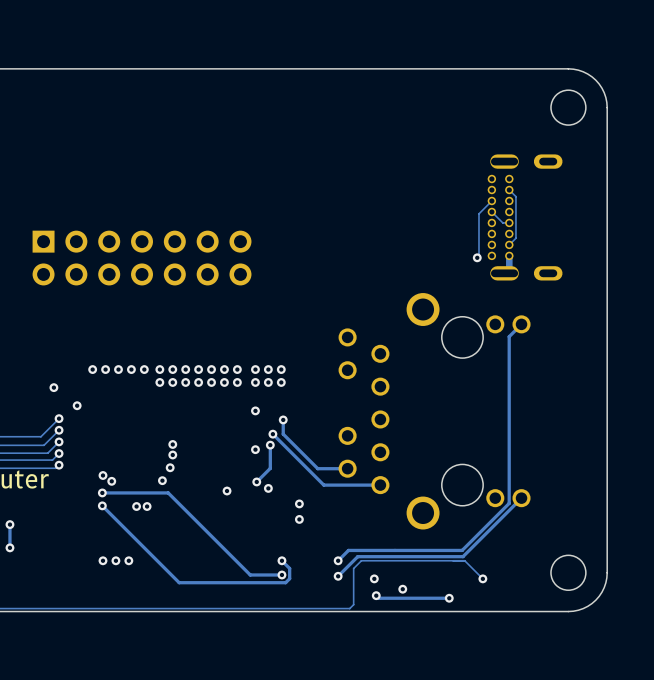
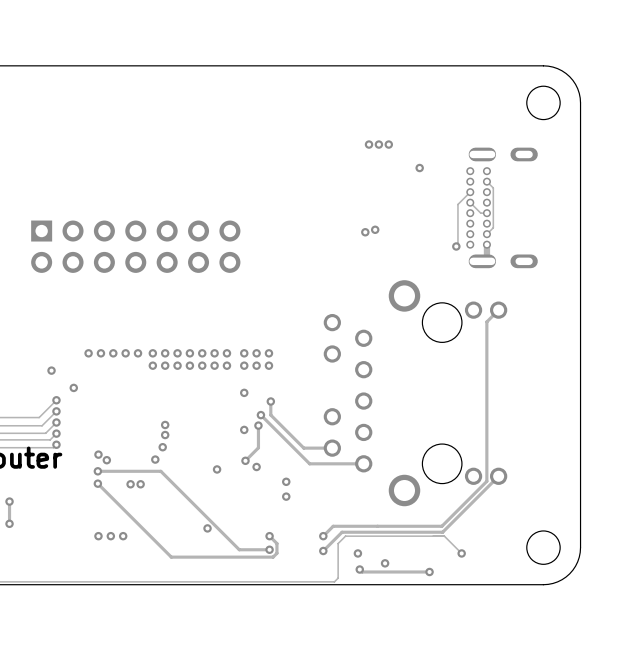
via: none -> (369, 144)
via: none -> (378, 144)
via: none -> (388, 144)
via: none -> (419, 168)
via: none -> (375, 229)
via: none -> (365, 232)
via: none -> (207, 528)

